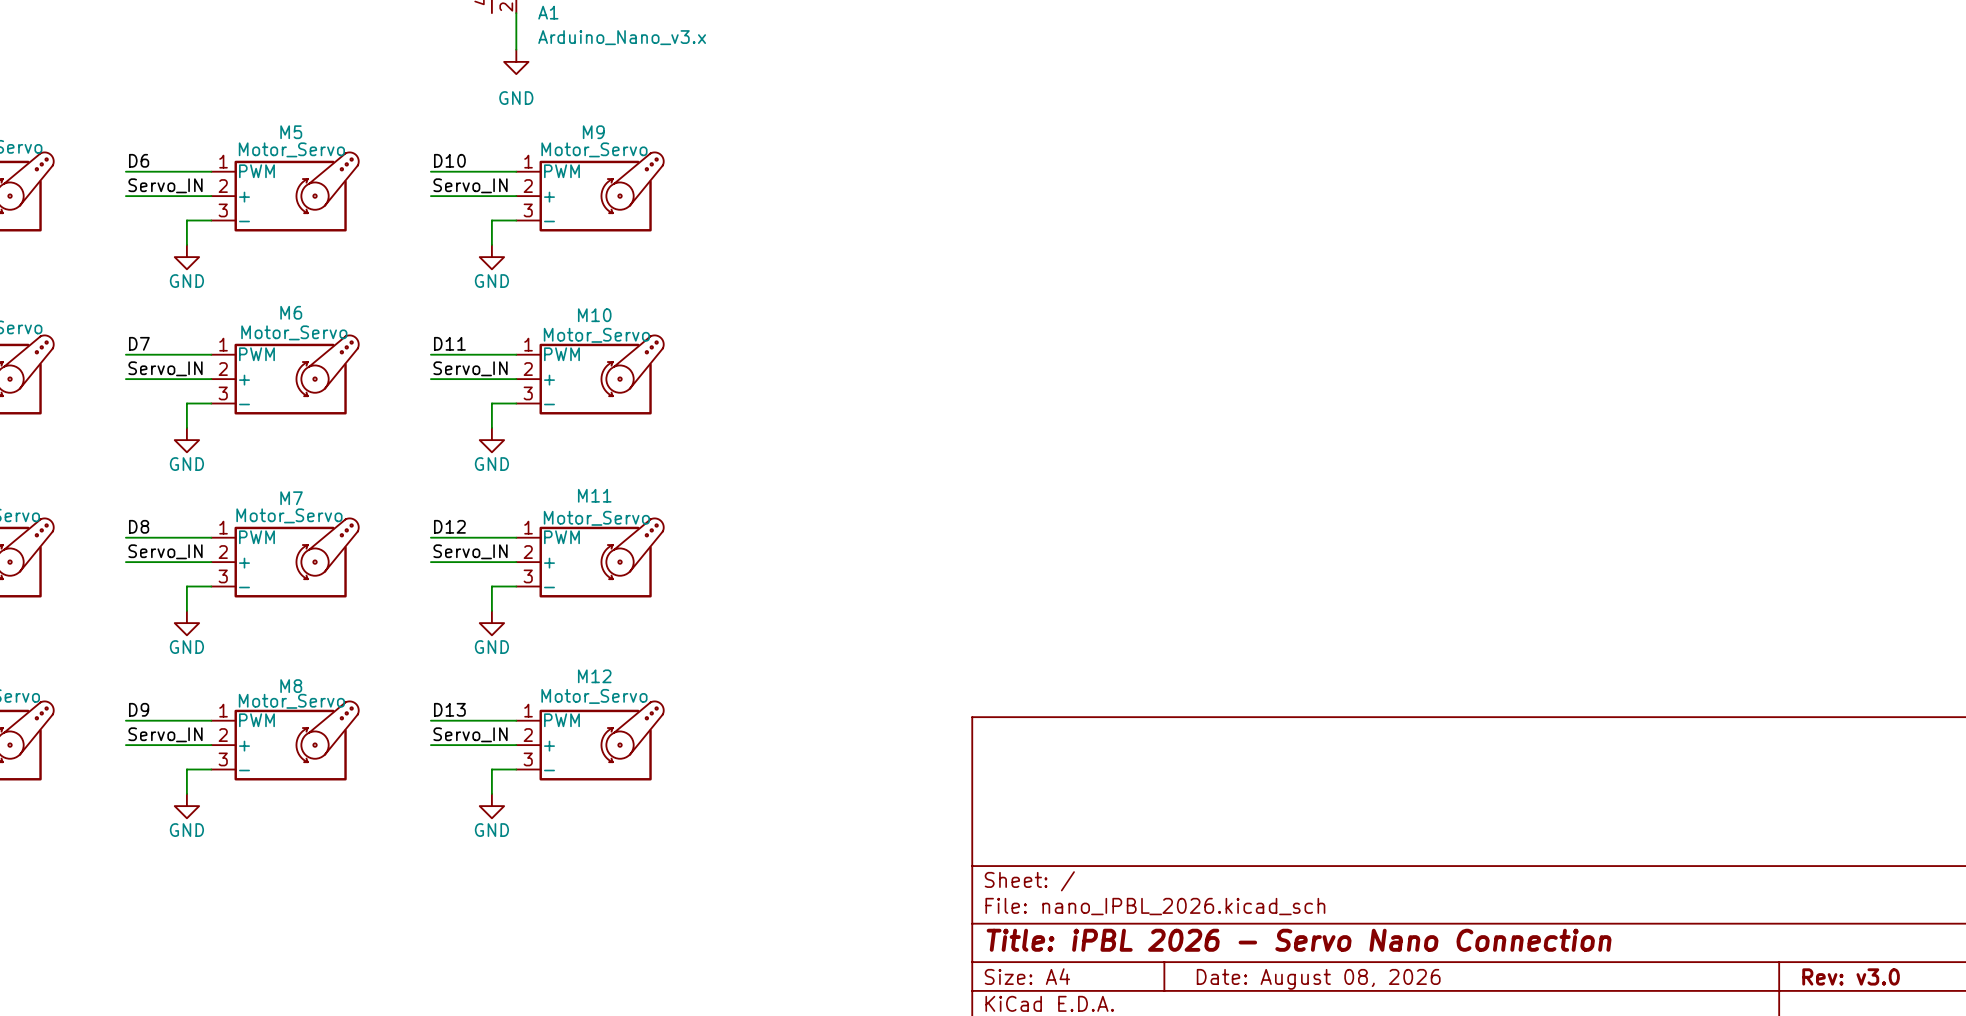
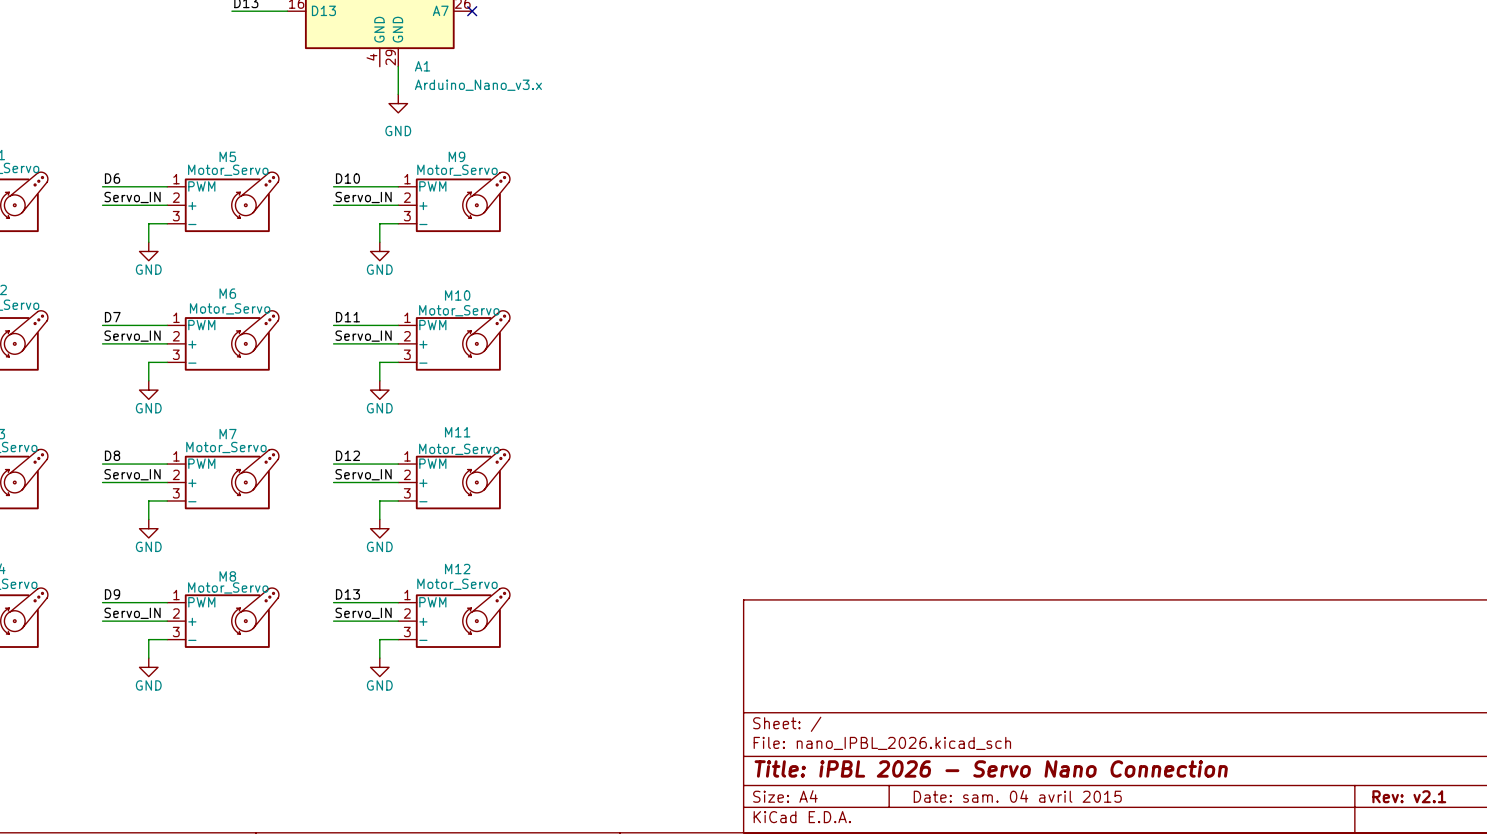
title block: Rev: v3.0 (1851, 976) -> Rev: v2.1 (1409, 796)
title block: Date: August 08, 2026 (1318, 979) -> Date: sam. 04 avril 2015 (1017, 796)

